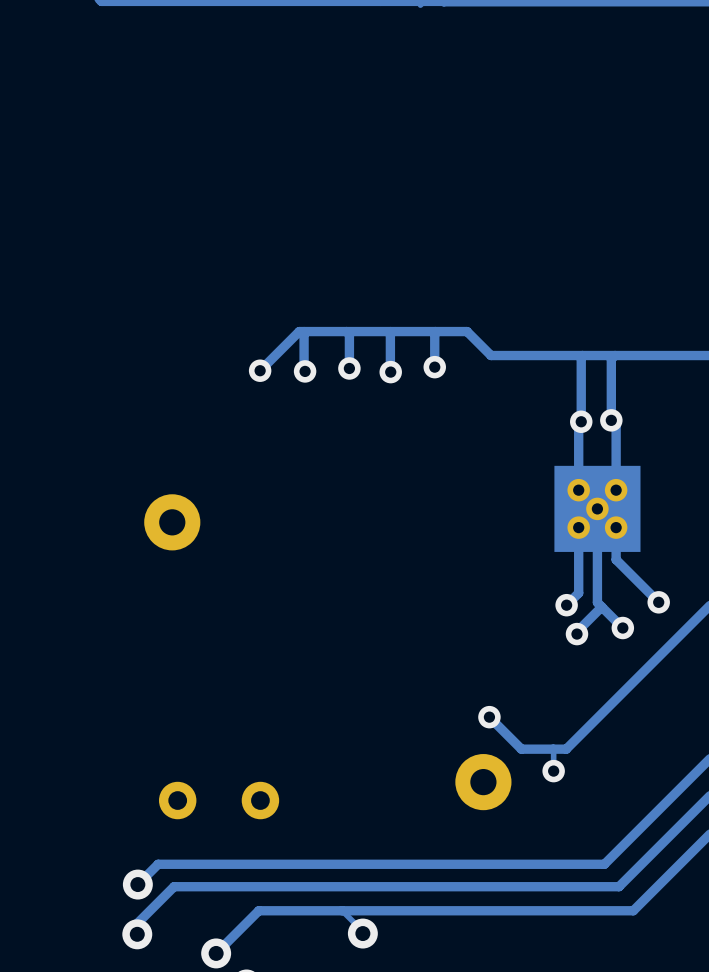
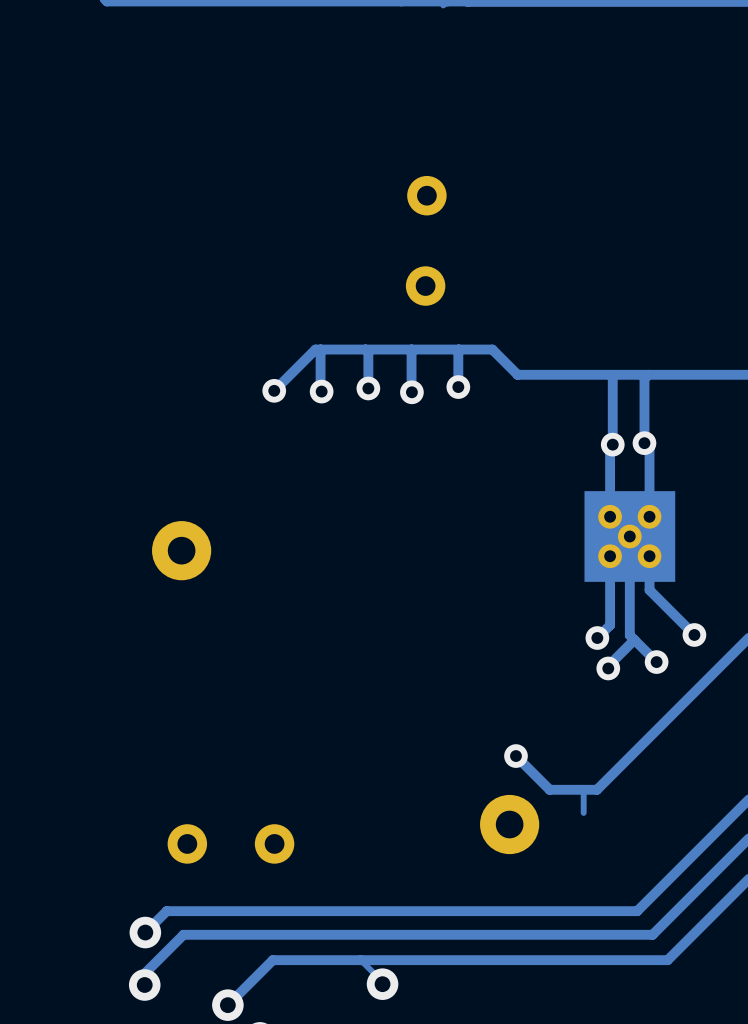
part: none -> (426, 195)
part: none -> (425, 286)
via: (553, 771) -> none

